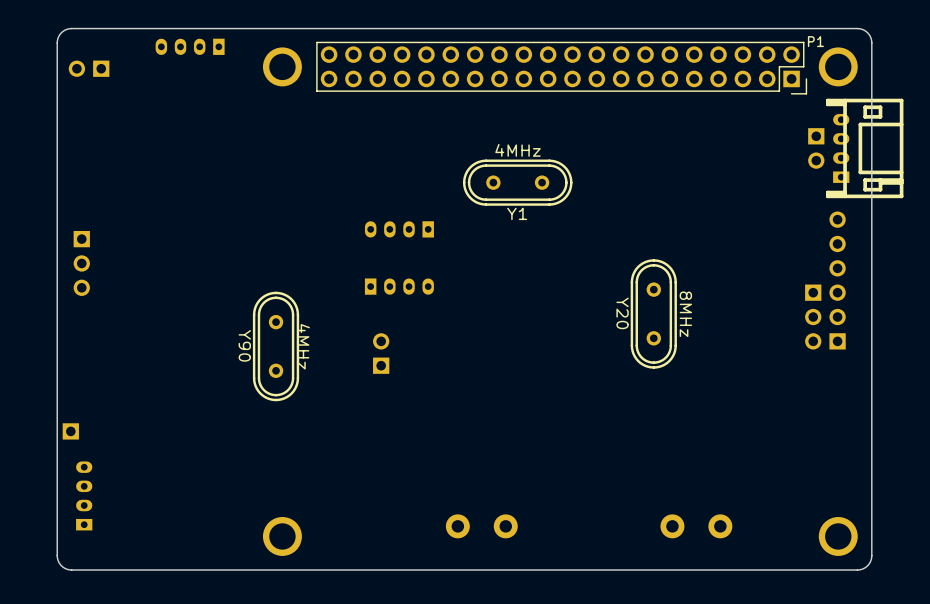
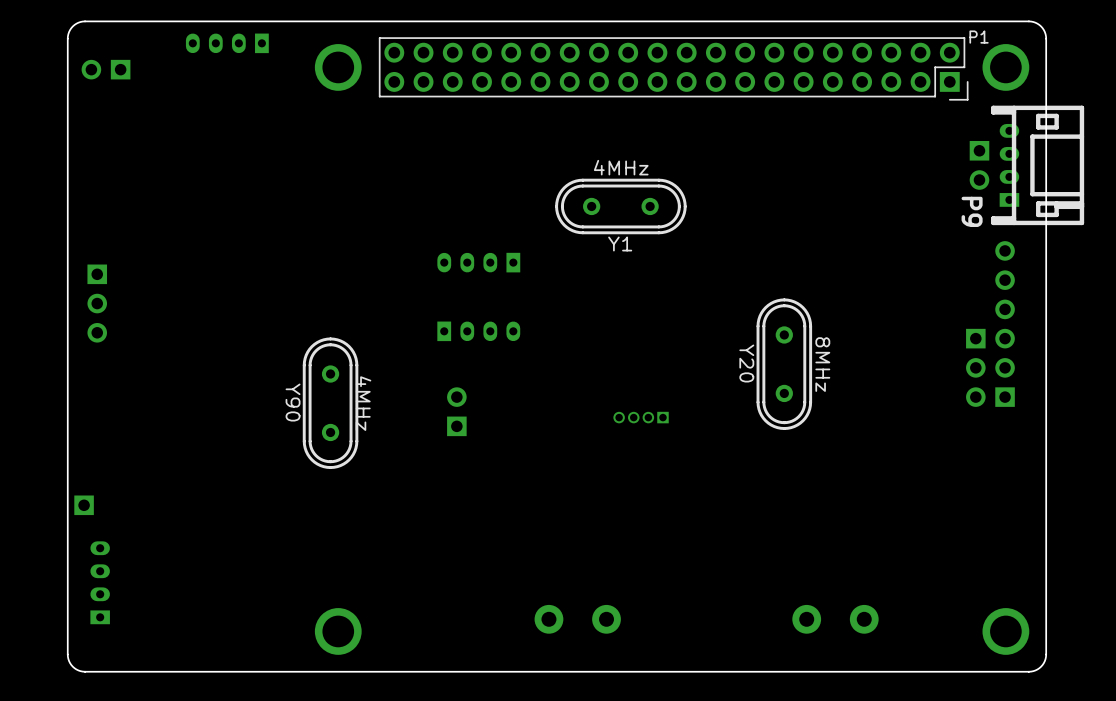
P9 name: none -> P9 (972, 211)
part: none -> (641, 417)

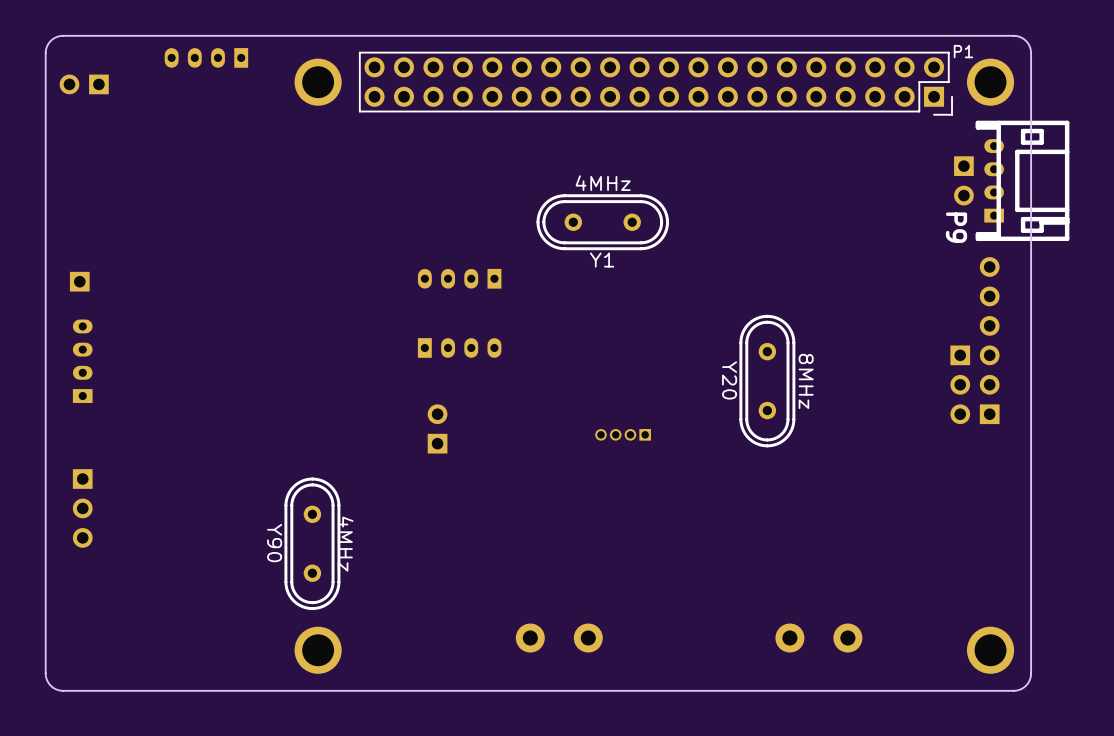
part position: (97, 303) -> (82, 508)
Y90 position: (330, 403) -> (312, 543)
part position: (84, 505) -> (79, 281)
part position: (100, 582) -> (82, 361)

